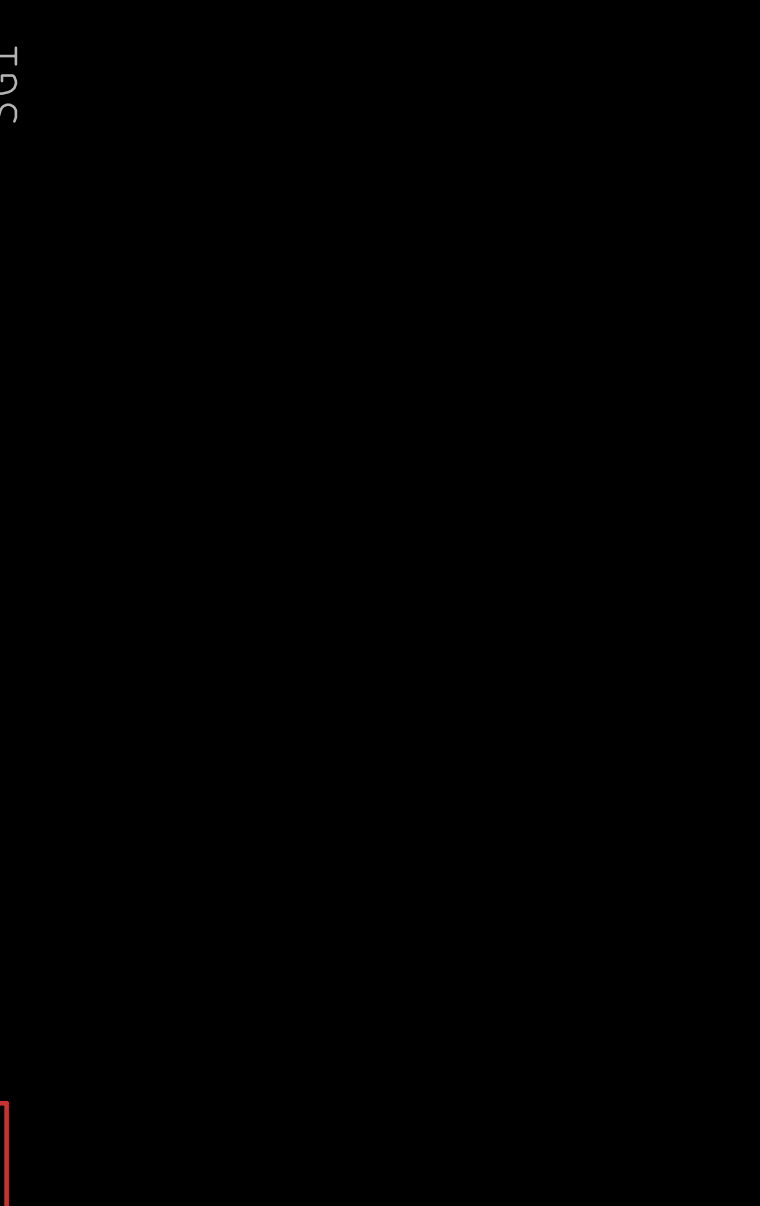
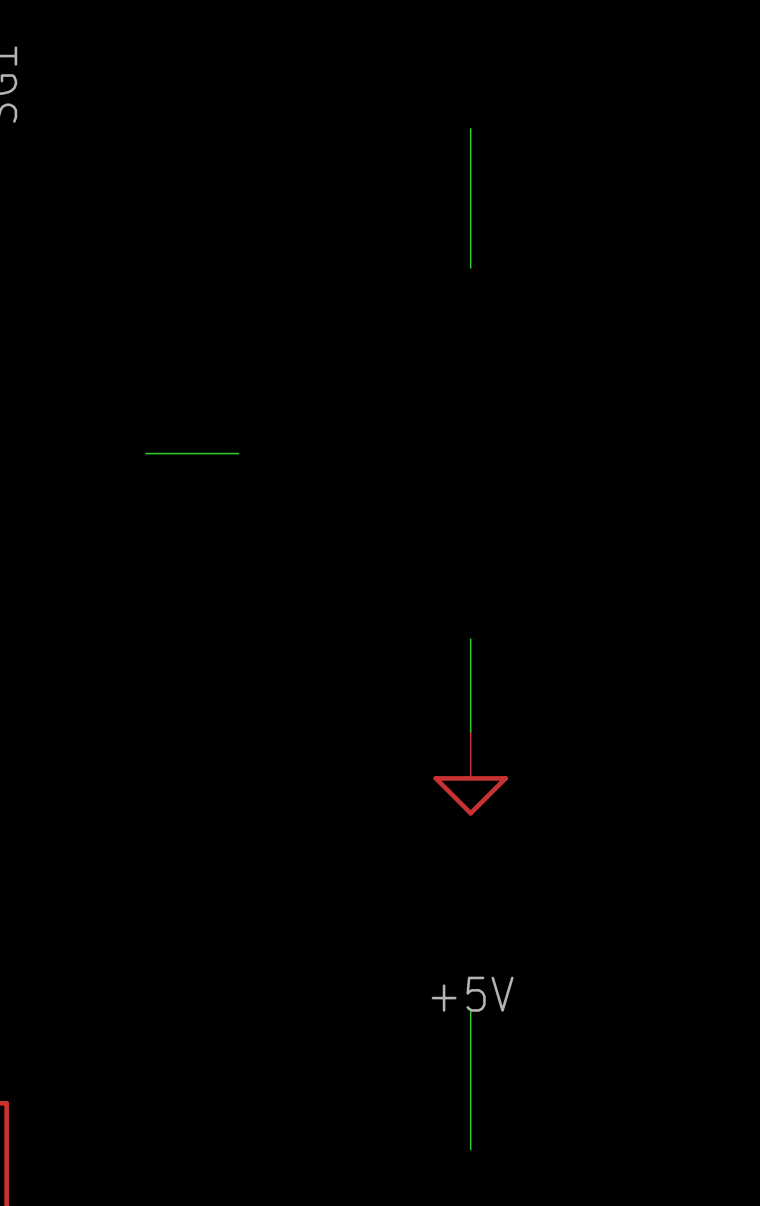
wire: none -> (470, 128) (470, 267)
wire: none -> (145, 453) (238, 453)
wire: none -> (470, 639) (470, 732)
power symbol: none -> (470, 773)
label: none -> +5V (472, 994)
wire: none -> (470, 1010) (470, 1149)

